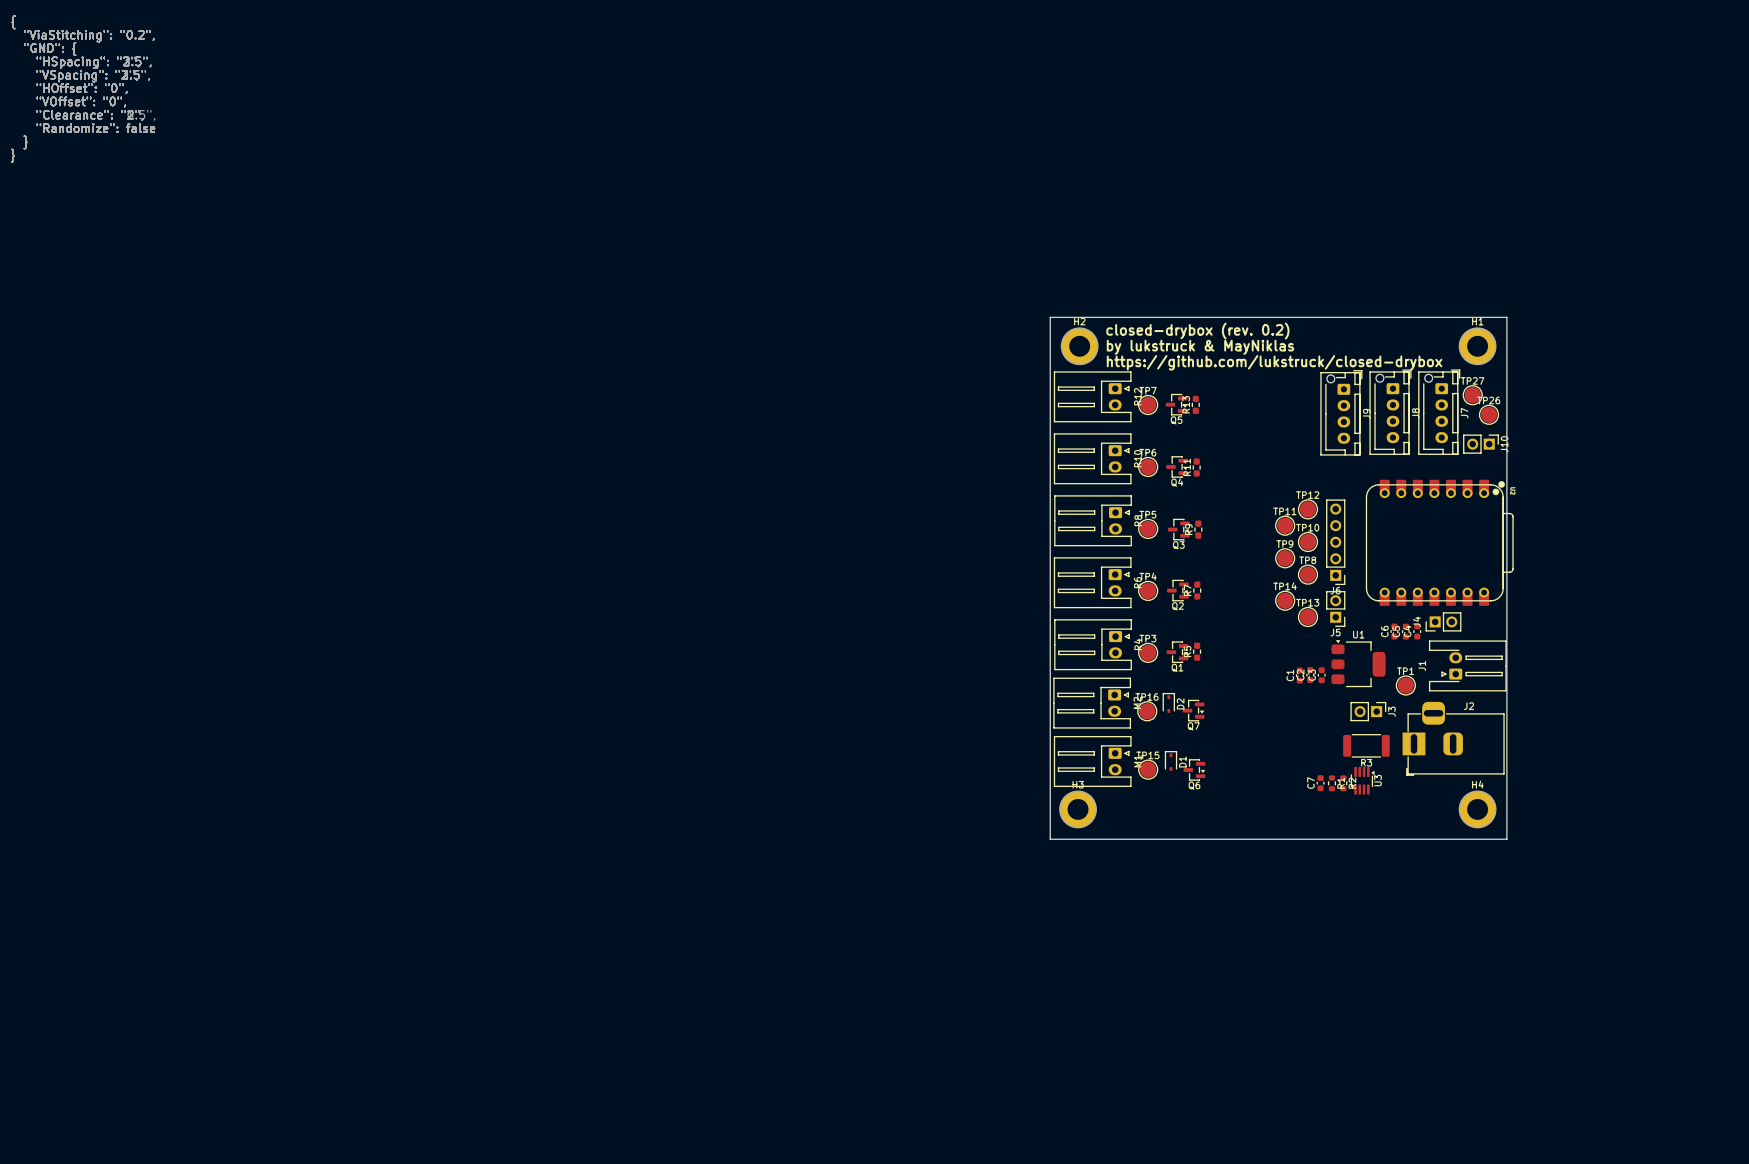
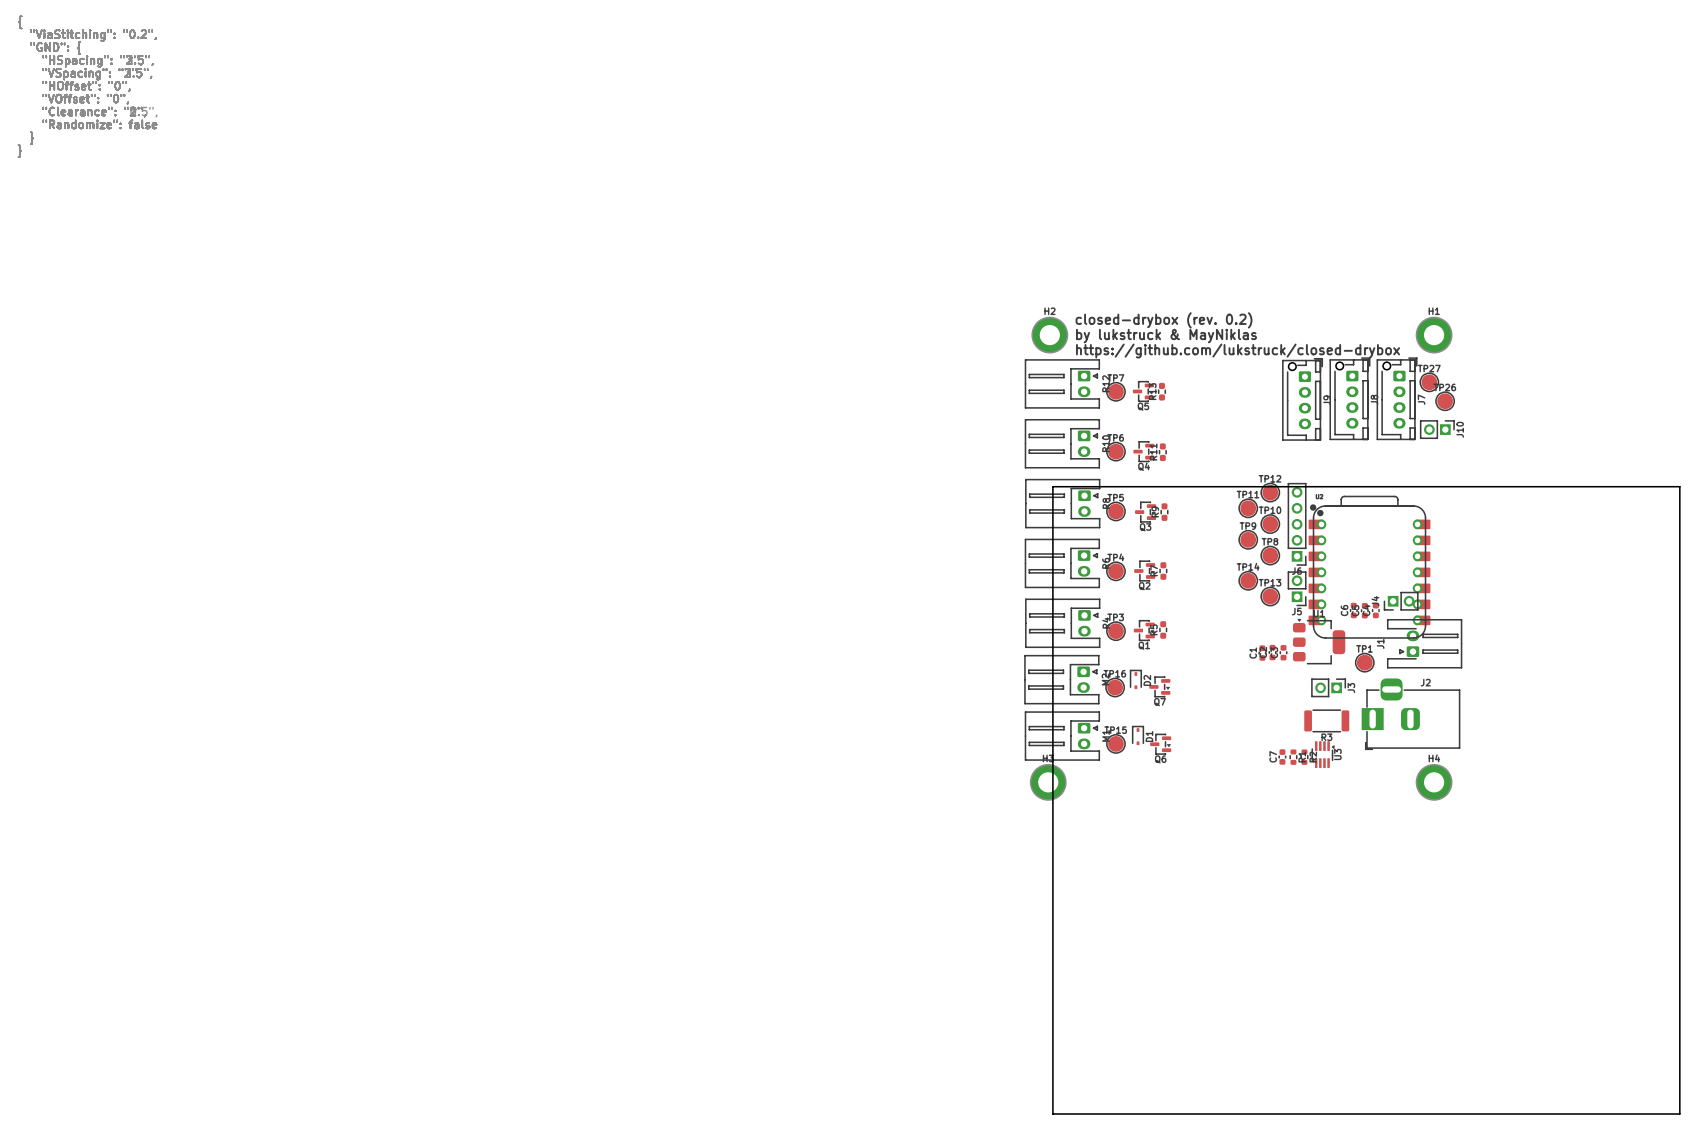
board edge: (1050, 317) (1506, 317) (1506, 839) (1050, 839) (1050, 317) -> none
board edge: none -> (1052, 486) (1679, 486) (1679, 1114) (1052, 1114) (1052, 486)
part rotation: 0° (1439, 542) -> 90° counterclockwise (1369, 567)

